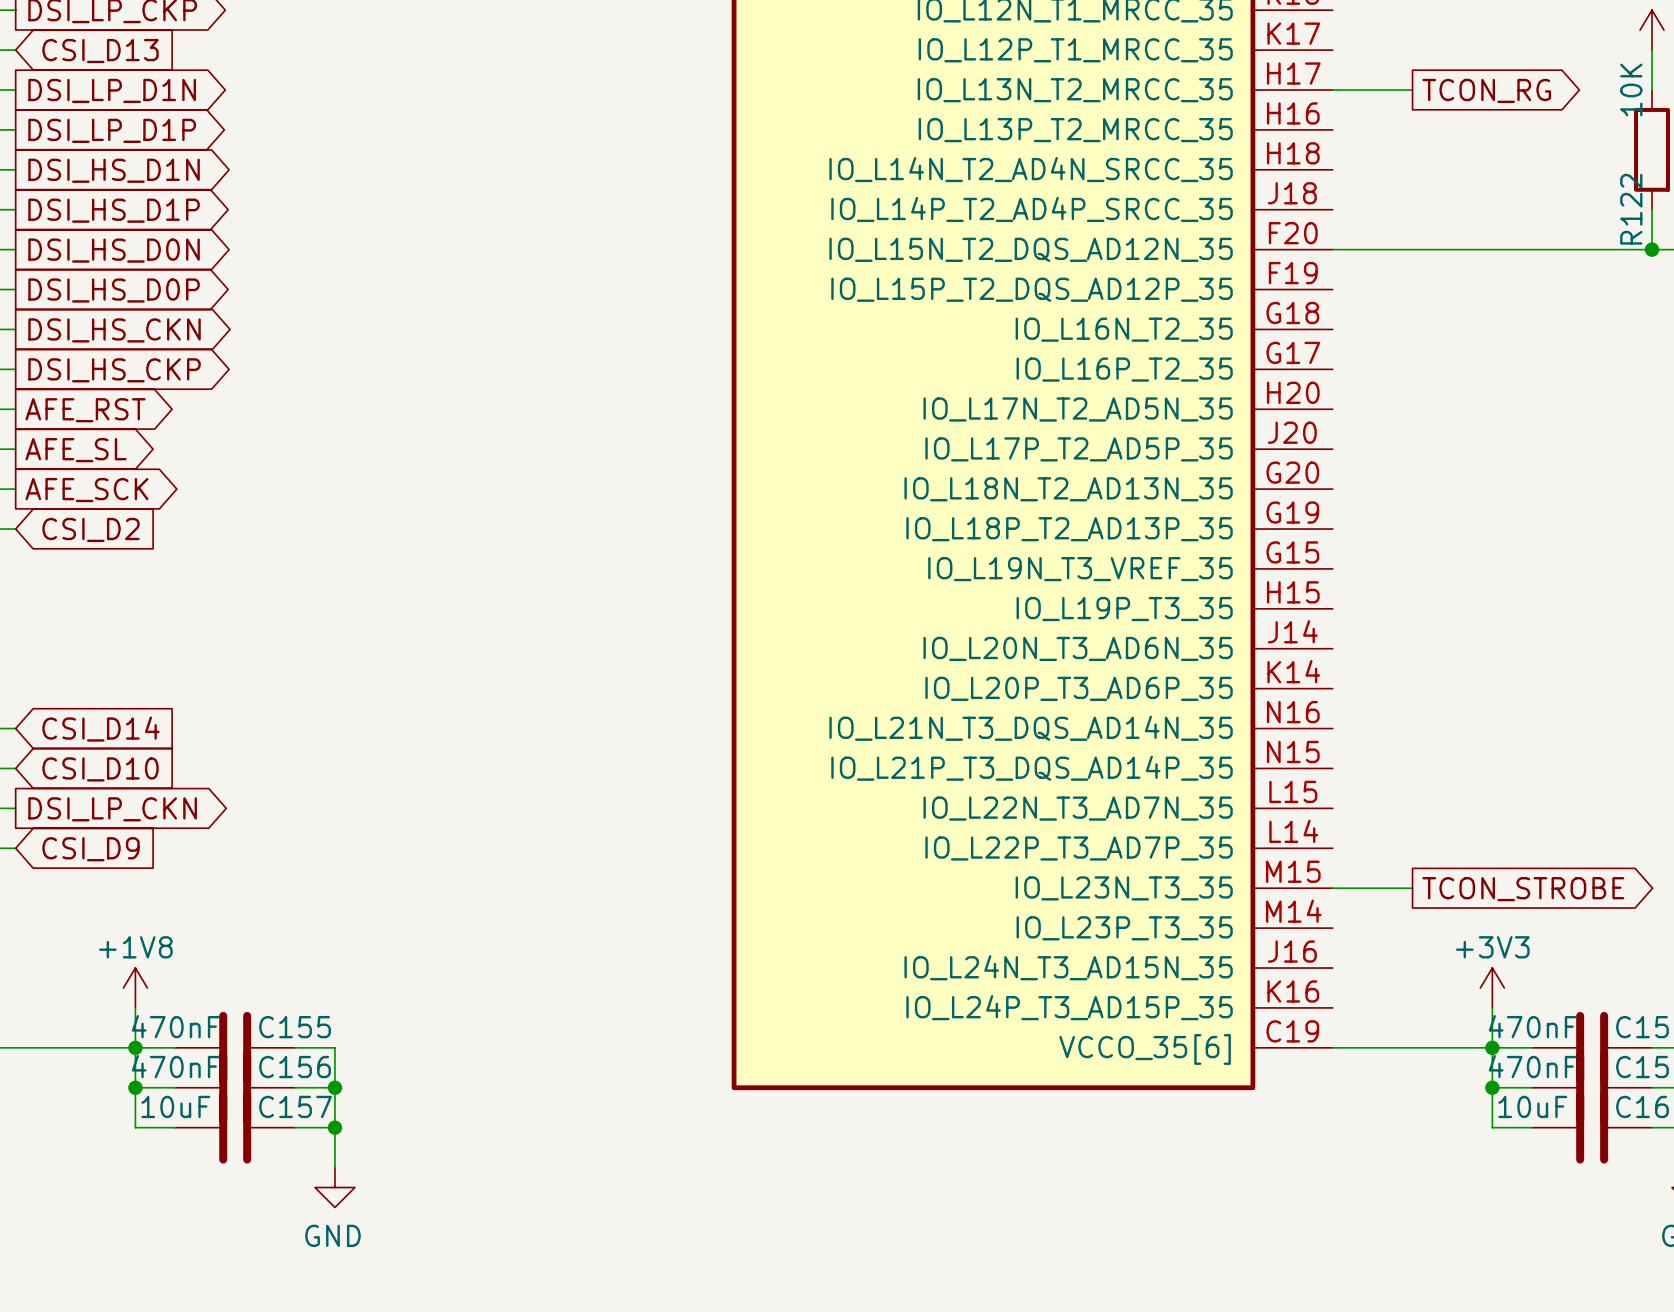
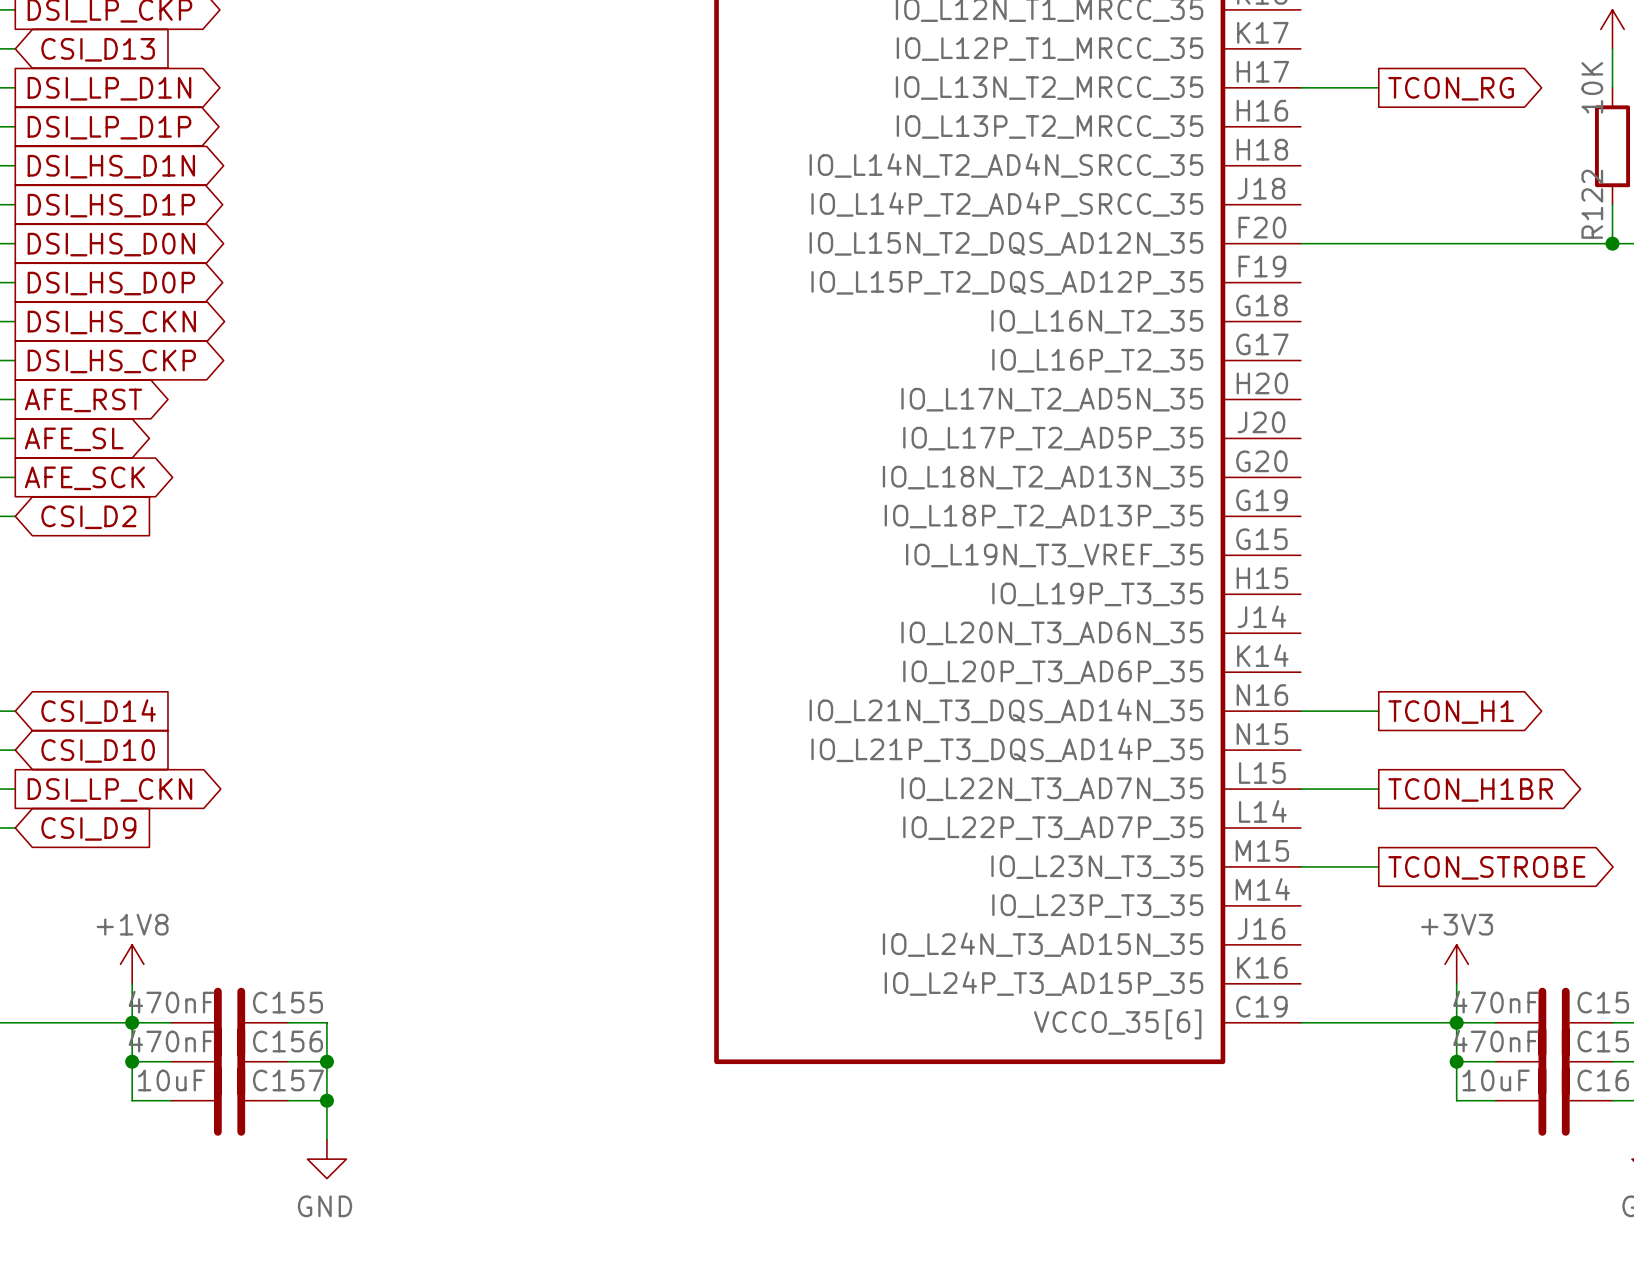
wire: none -> (1300, 711) (1378, 711)
global label: none -> TCON_H1 (1451, 712)
wire: none -> (1300, 789) (1378, 789)
global label: none -> TCON_H1BR (1470, 789)

